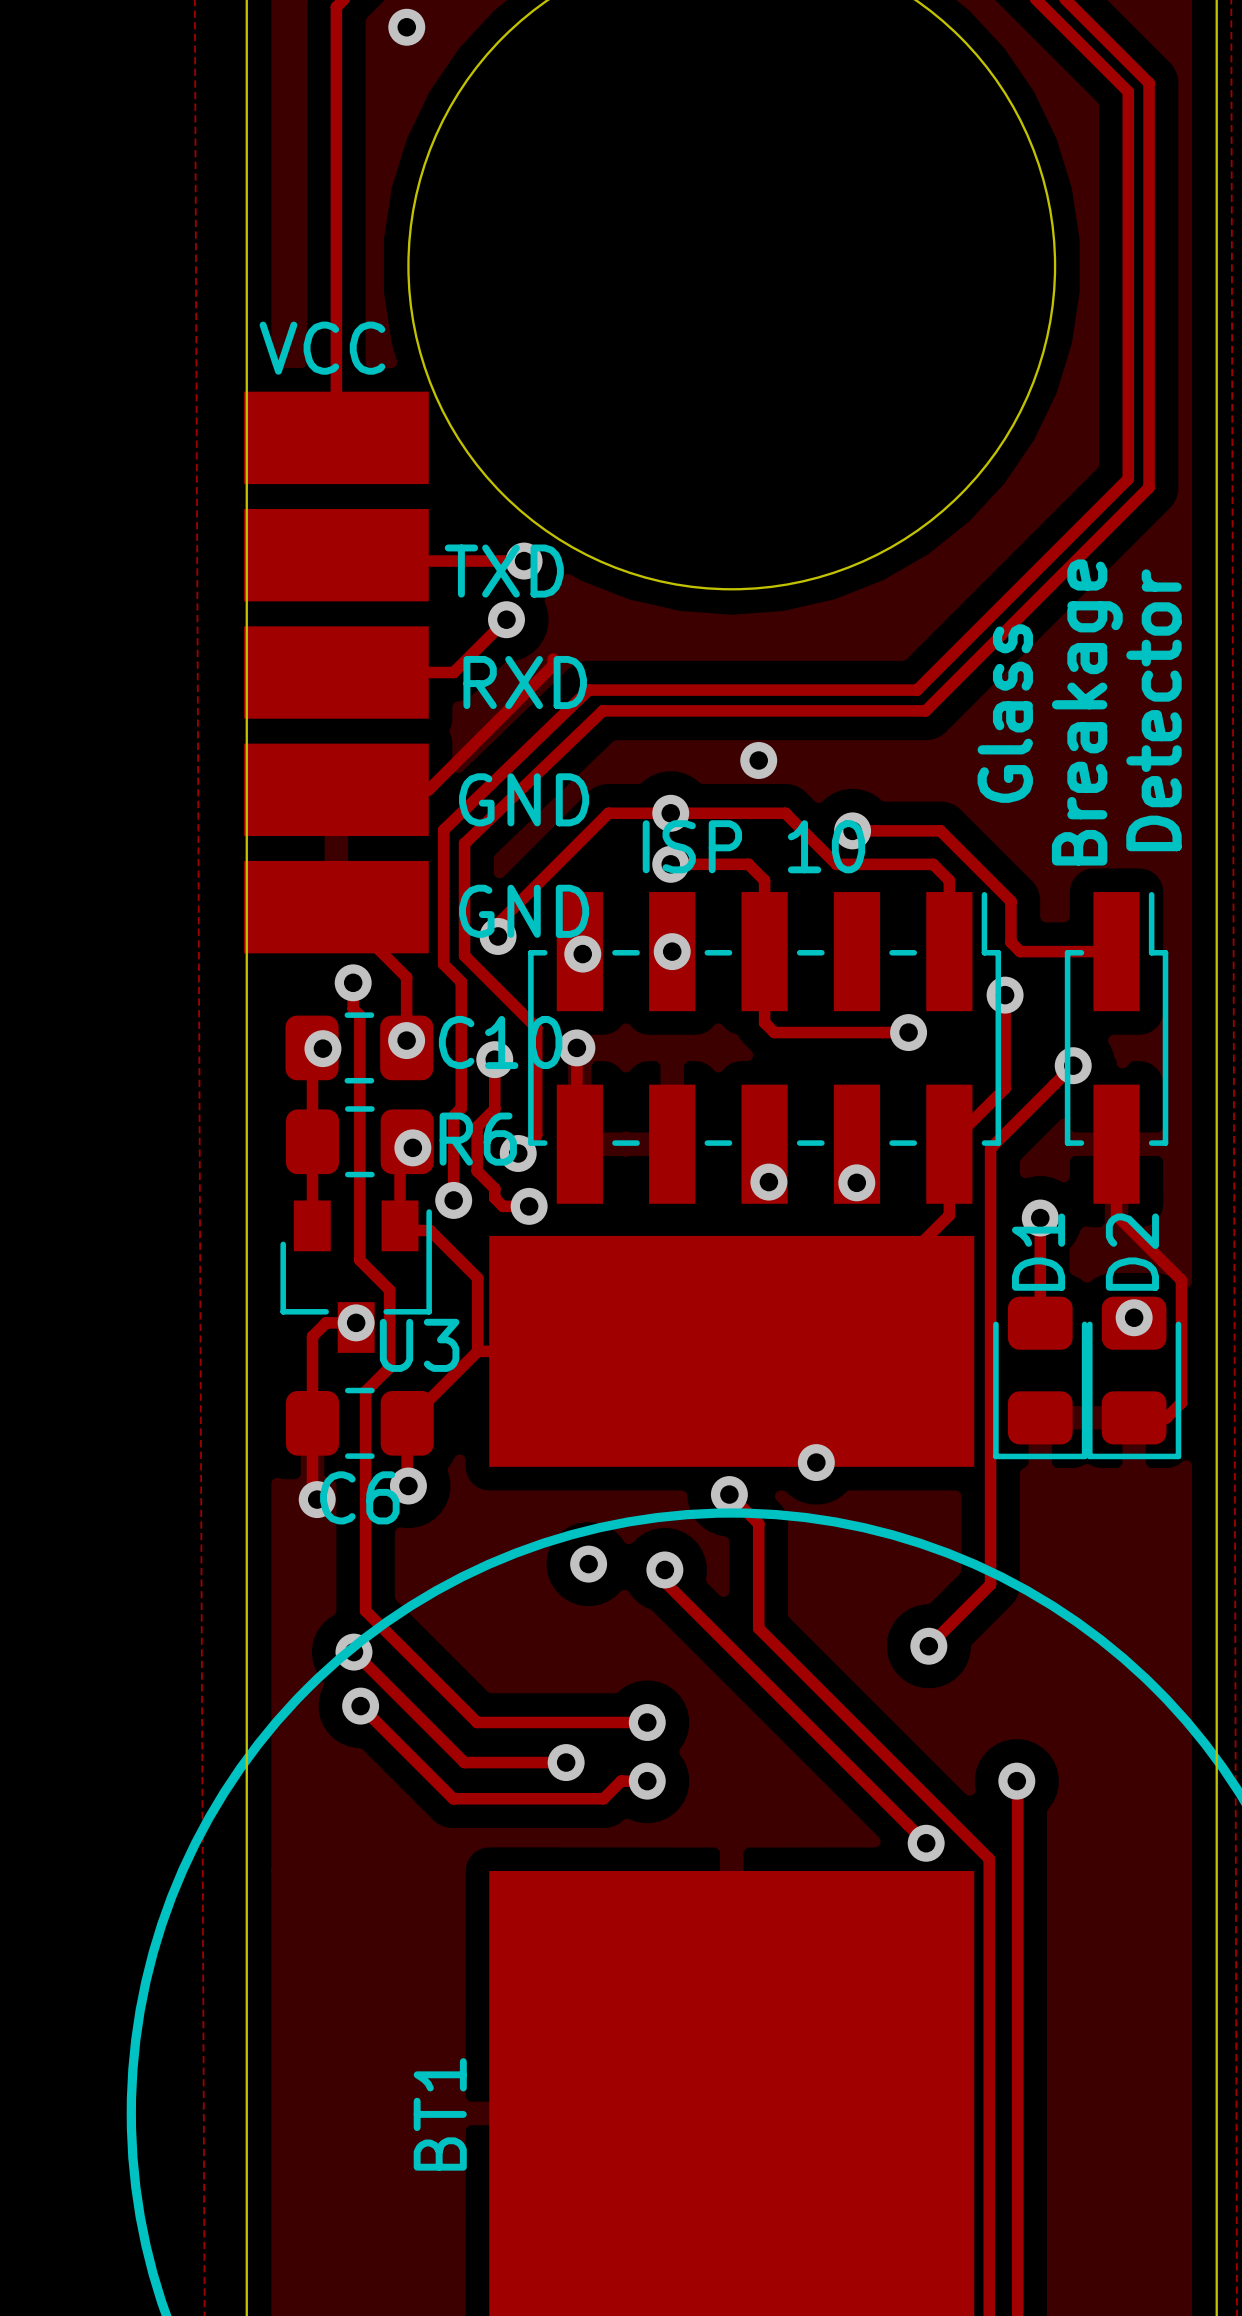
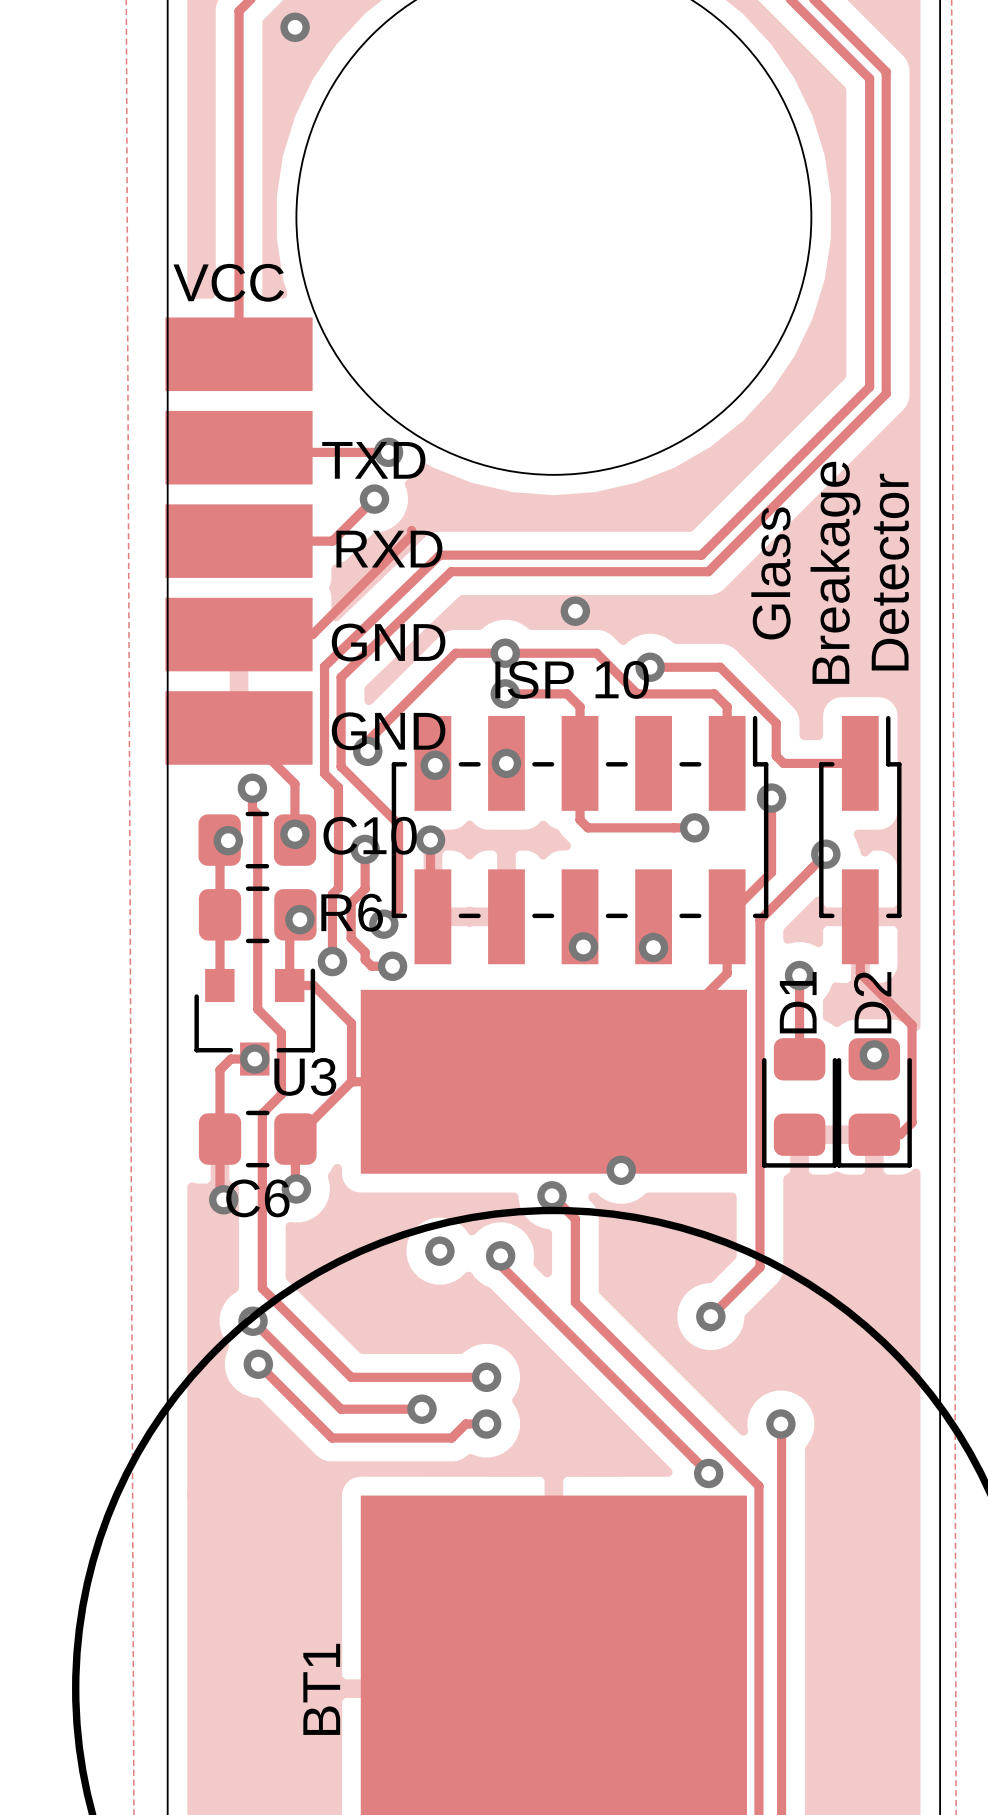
U3 footprint: [280, 1200, 432, 1353] -> [194, 968, 316, 1076]

